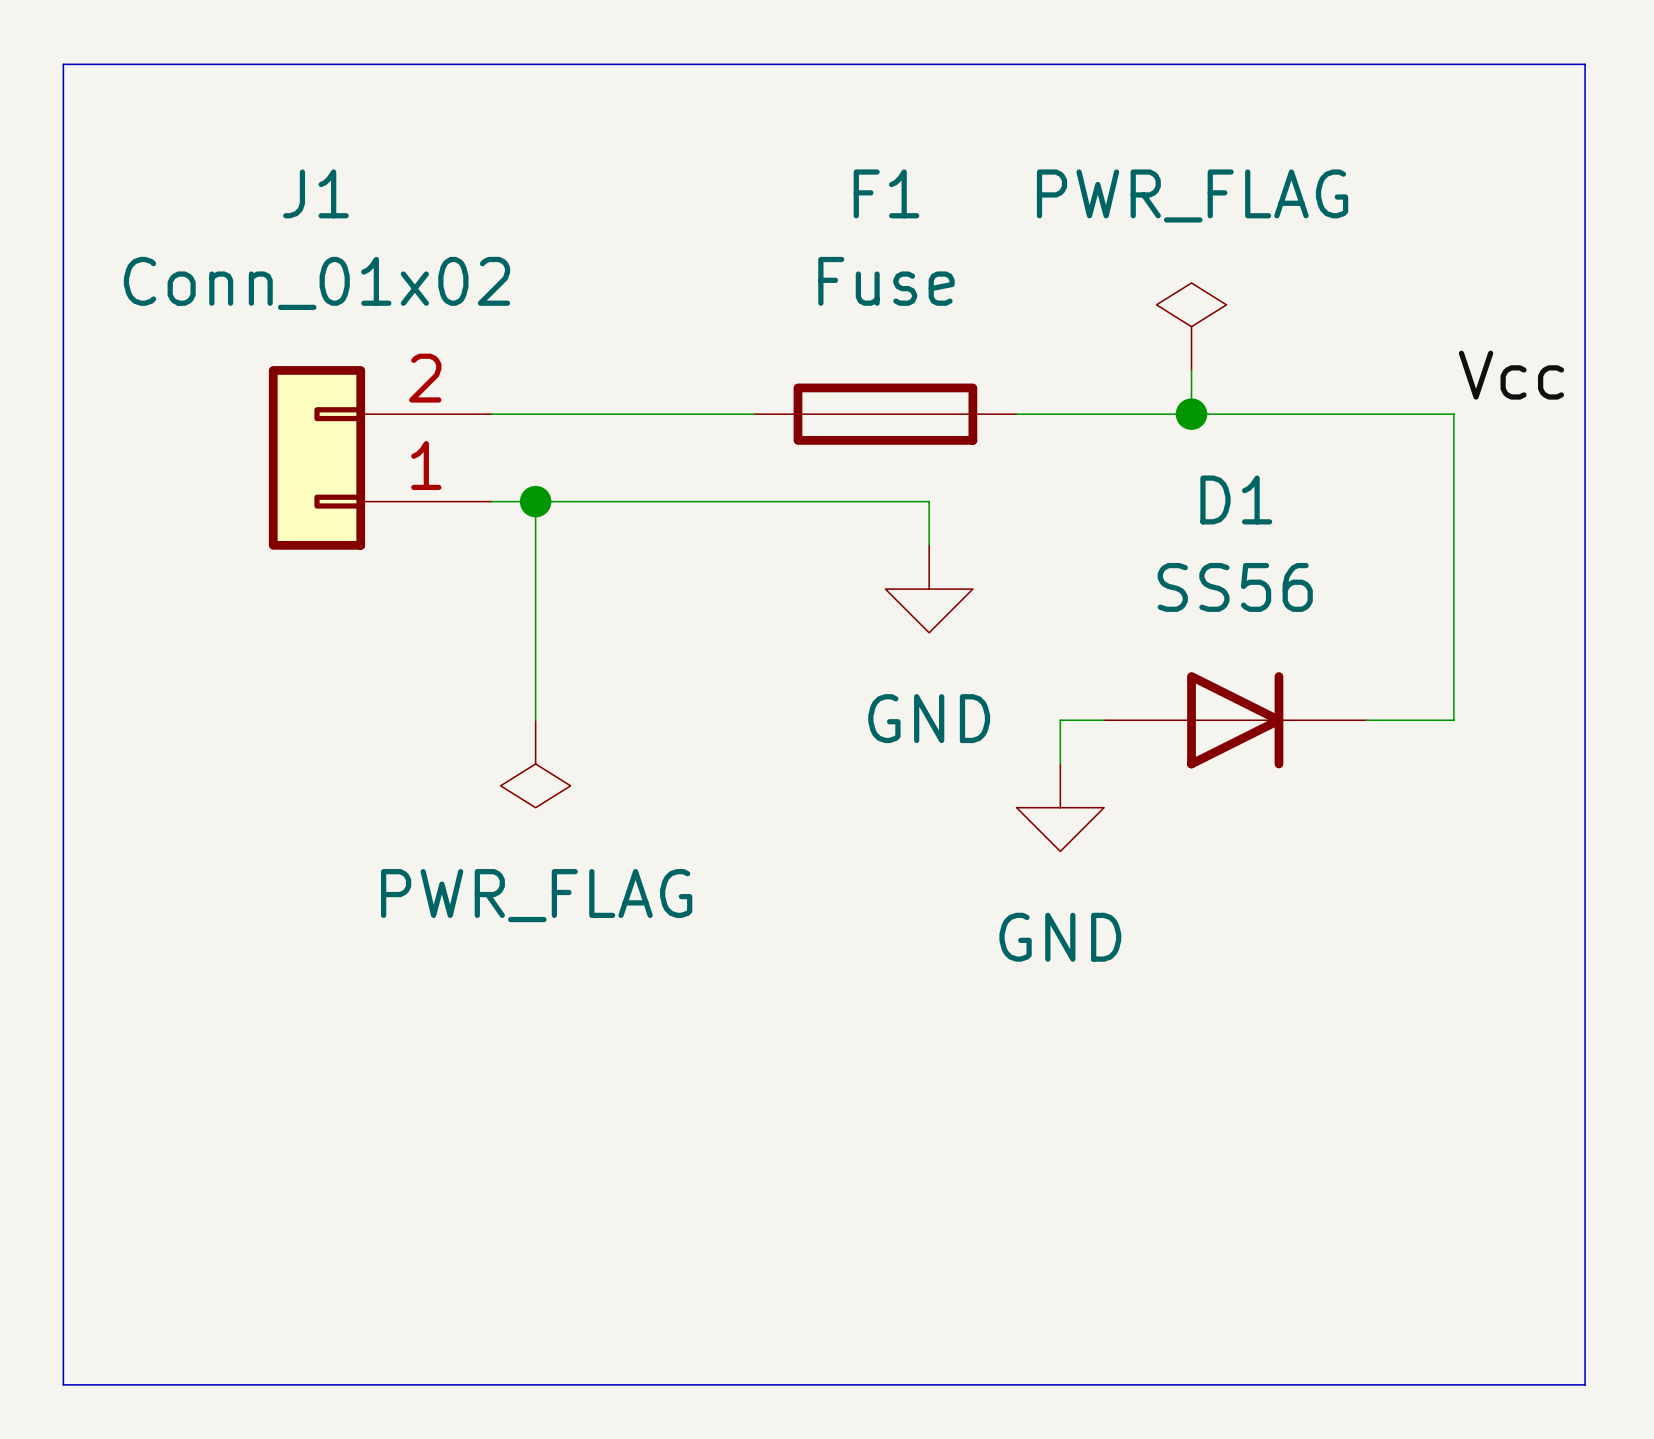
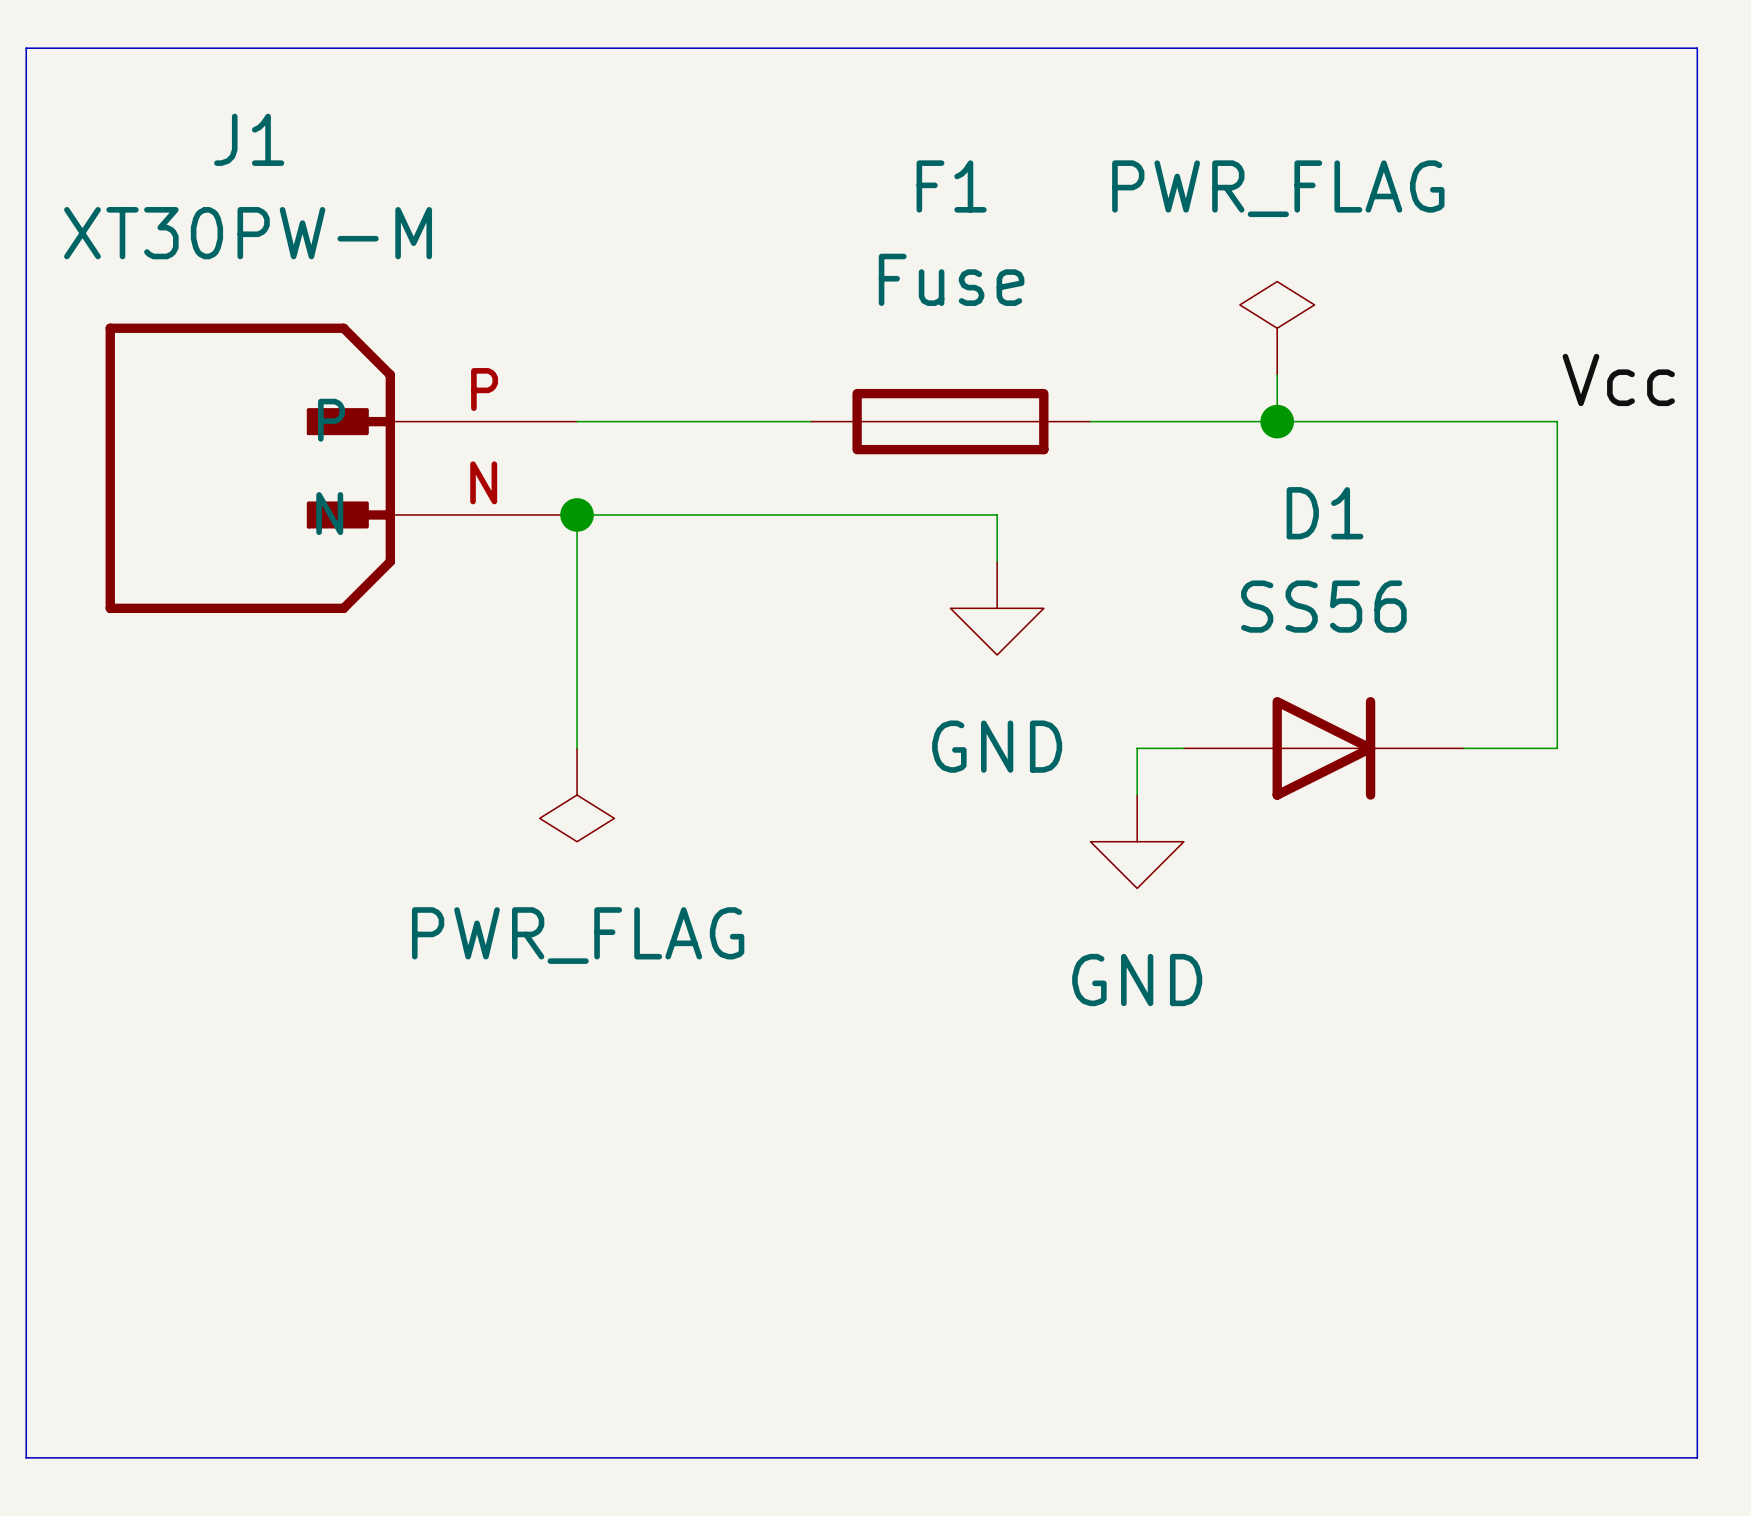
line: (63, 64) (63, 1384) -> (72, 48) (26, 48) (26, 1457) (72, 1457)
J1 value: Conn_01x02 (316, 283) -> XT30PW-M (248, 233)
J1 symbol: [268, 366, 492, 550] -> [105, 323, 578, 614]

